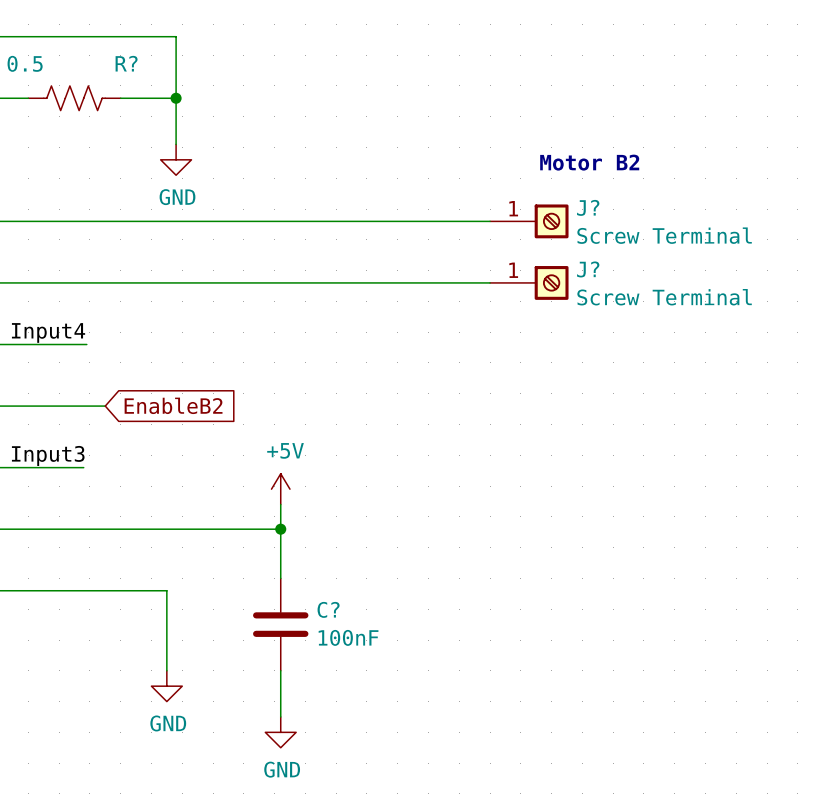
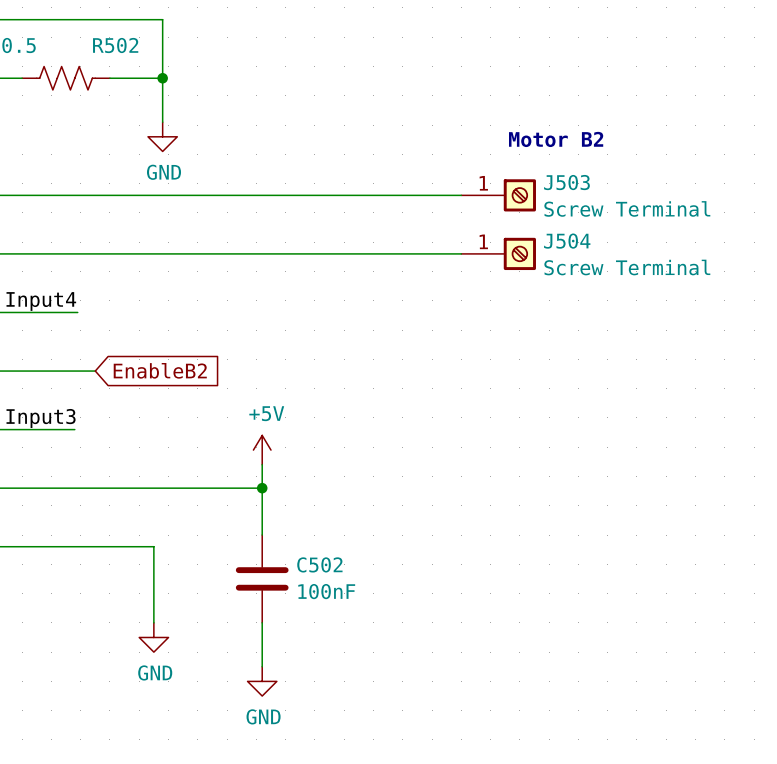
R? name: R? (126, 63) -> R502 (115, 45)
J? name: J? (588, 207) -> J503 (566, 182)
J? name: J? (588, 269) -> J504 (567, 241)
C? name: C? (328, 609) -> C502 (319, 564)

